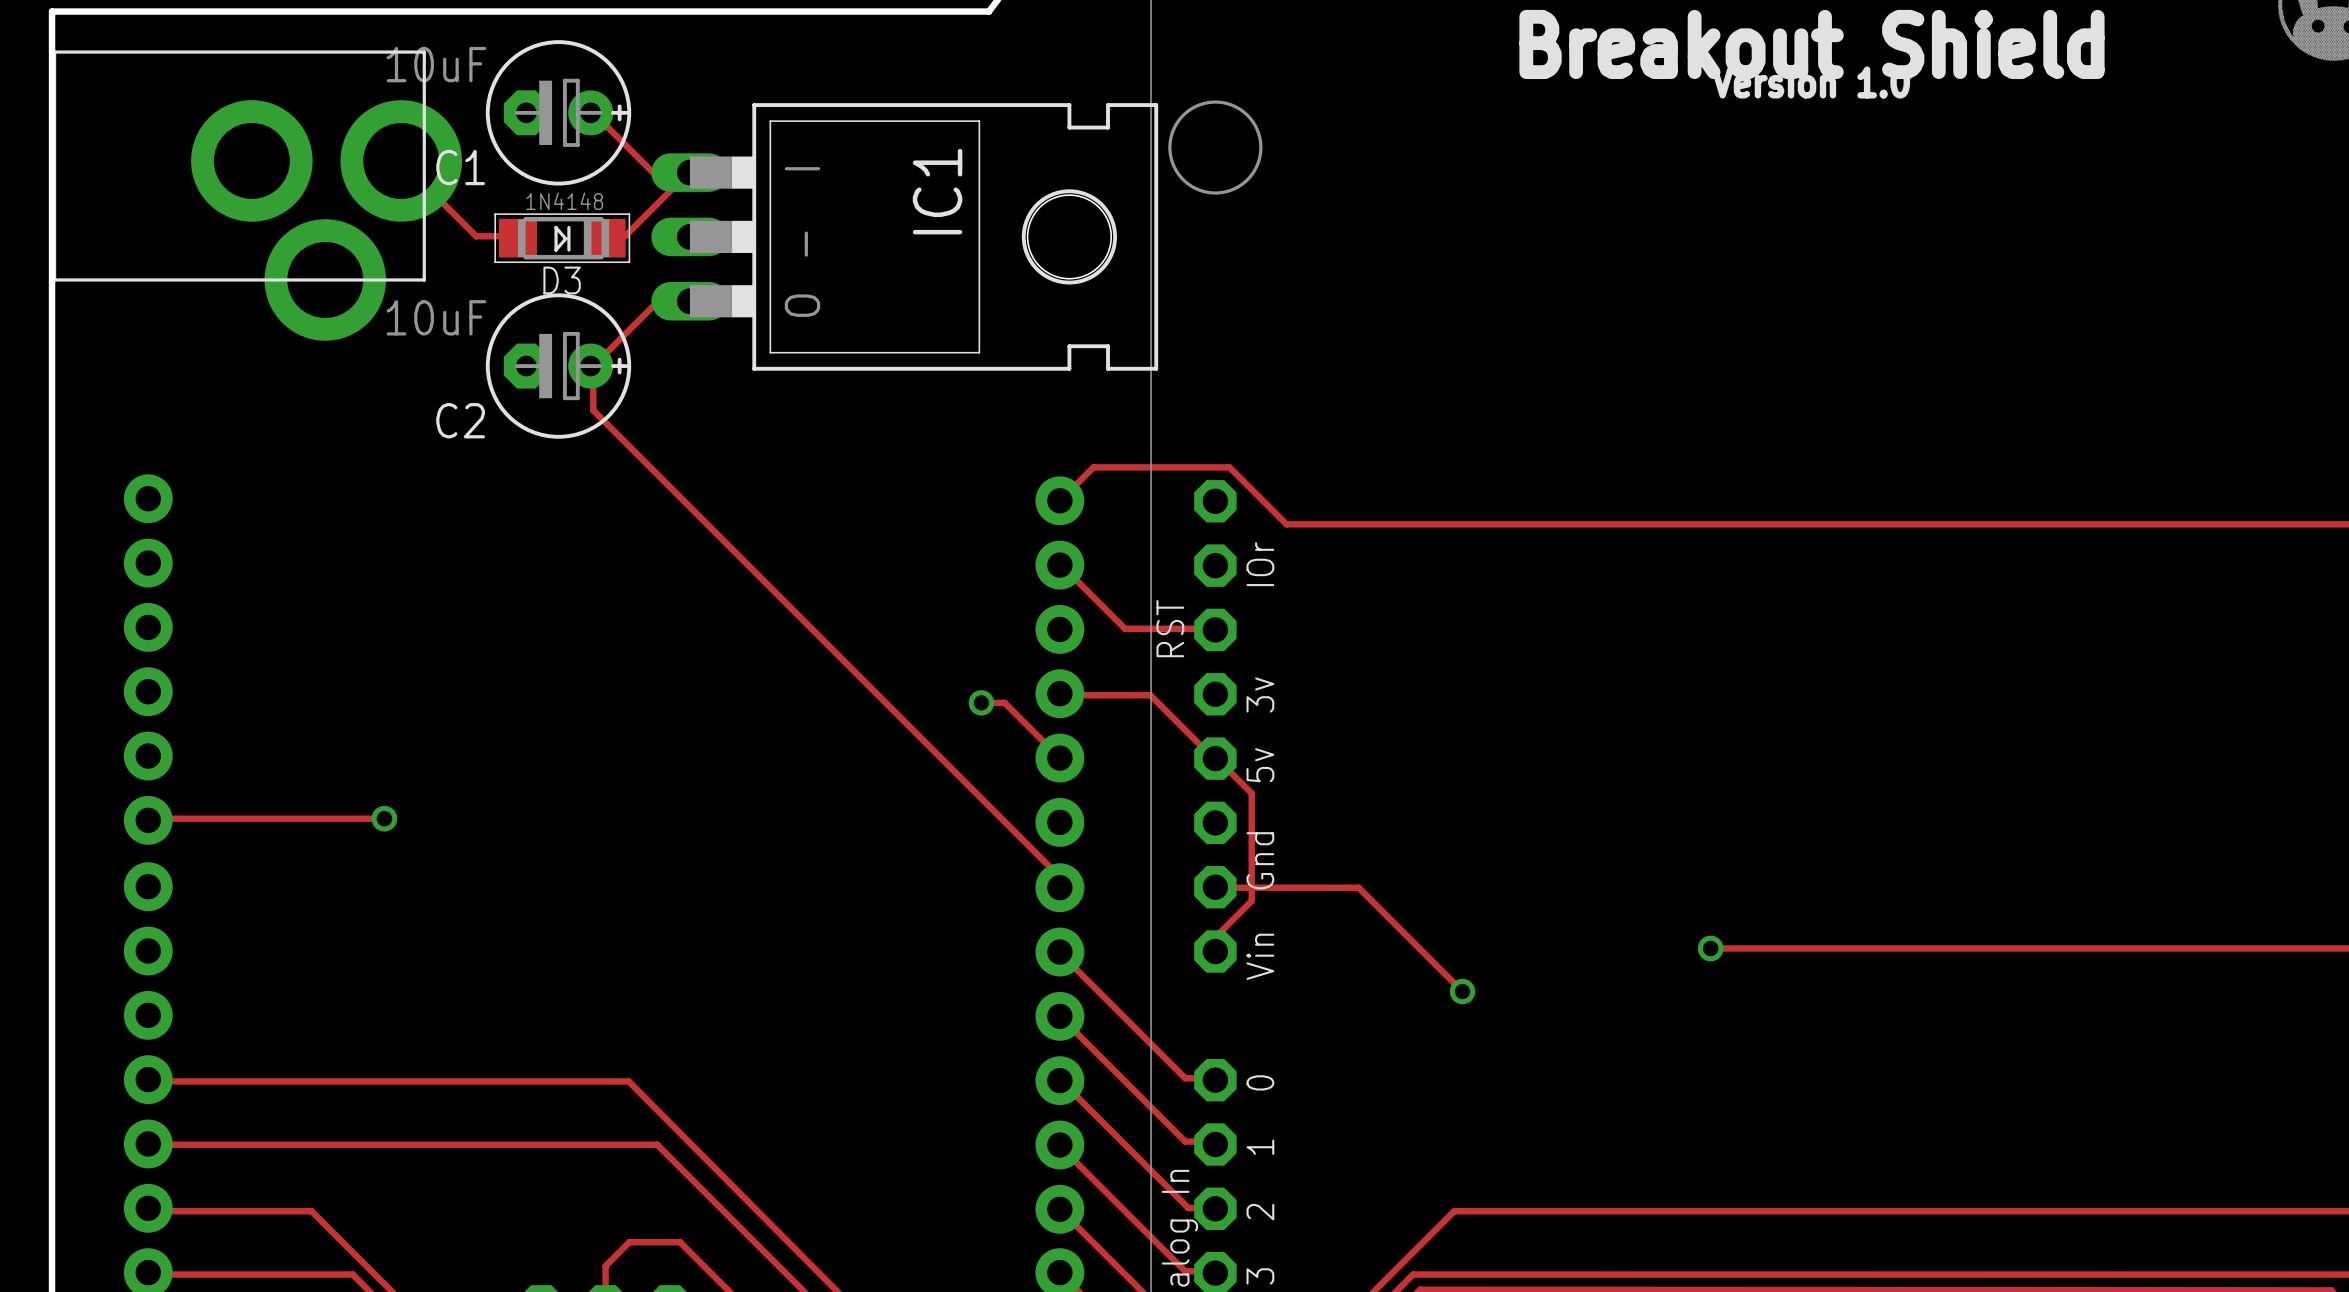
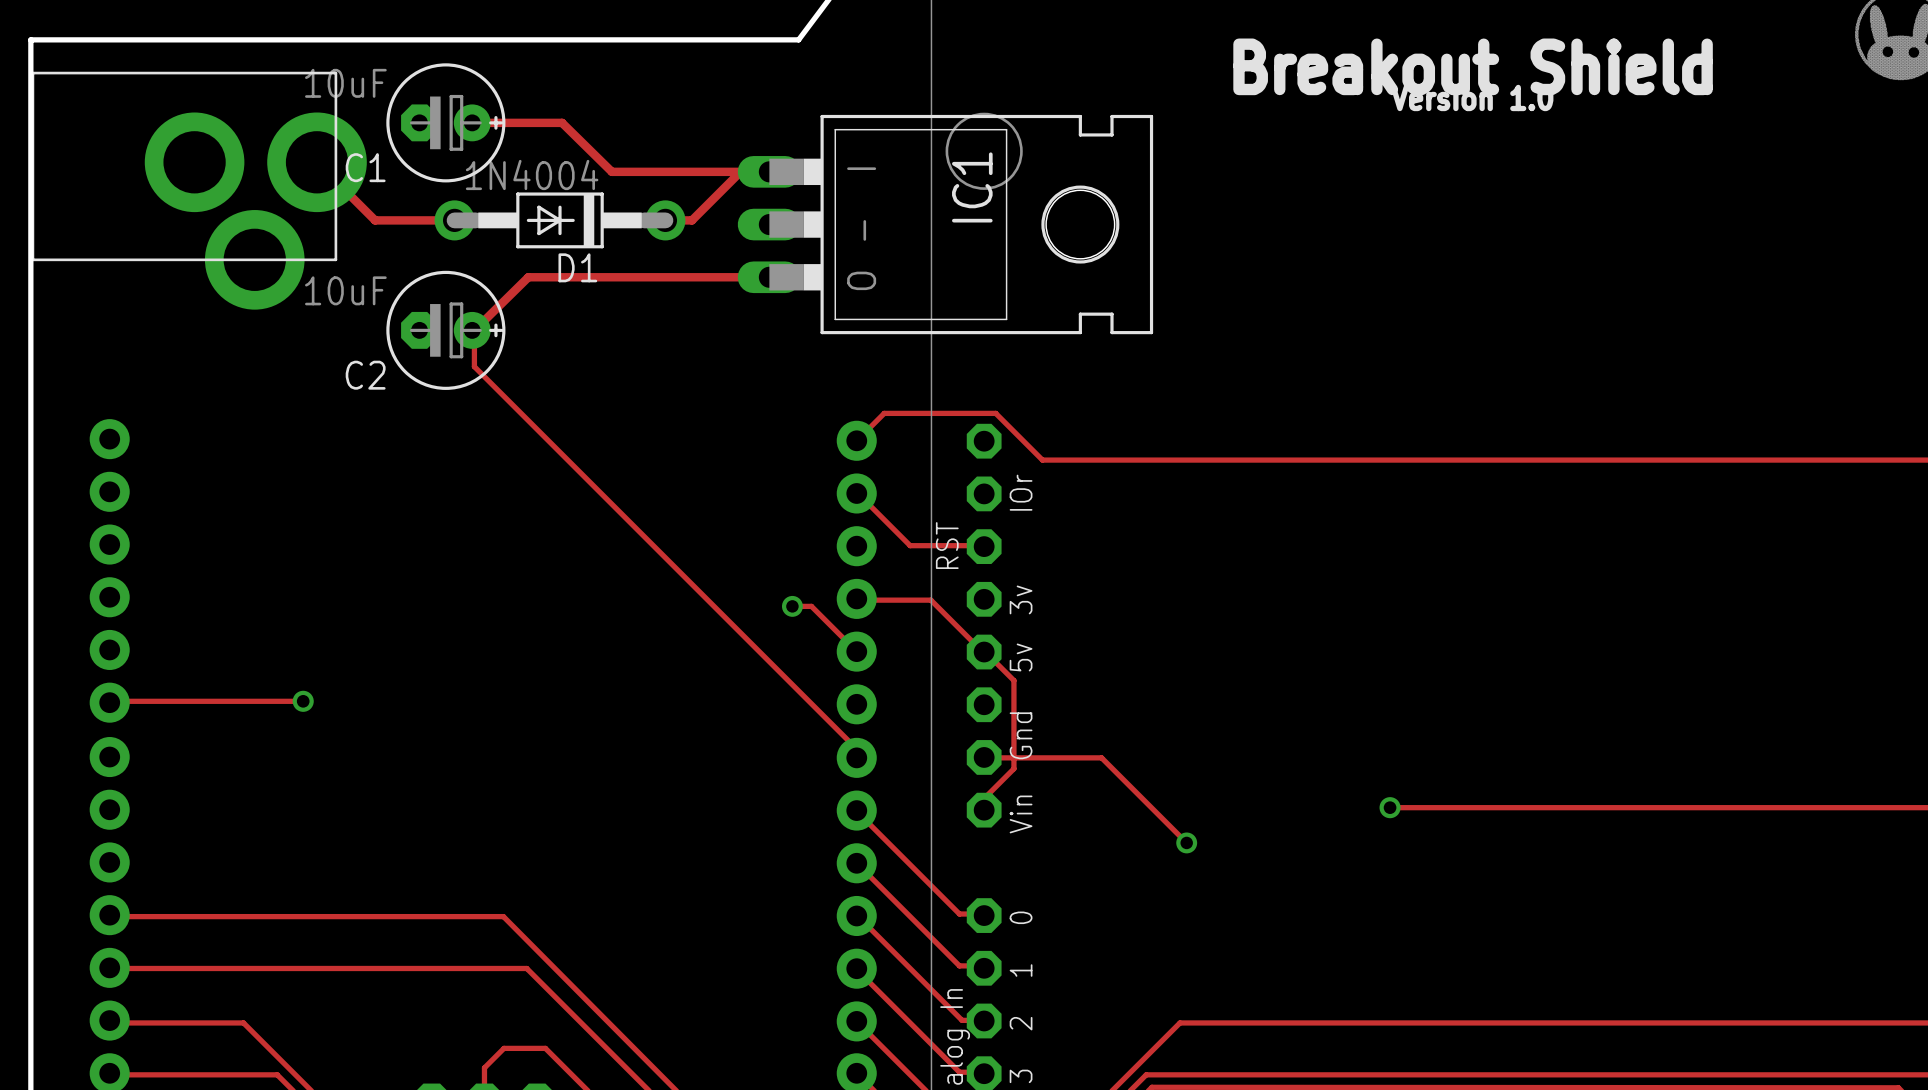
track: (593, 112) (669, 188) (689, 172) (624, 236) (609, 236) (606, 238) -> (474, 122) (562, 122) (611, 171) (769, 171)
track: (401, 160) (476, 236) (517, 236) (517, 238) -> (317, 162) (375, 220) (454, 220)
track: none -> (740, 171) (691, 220) (665, 220)
D1: none -> 1N4004 (560, 220)
IC1 position: (904, 236) -> (945, 224)
D3: 1N4148 (562, 238) -> none
track: (689, 301) (656, 302) (593, 366) -> (769, 277) (528, 277) (474, 330)

